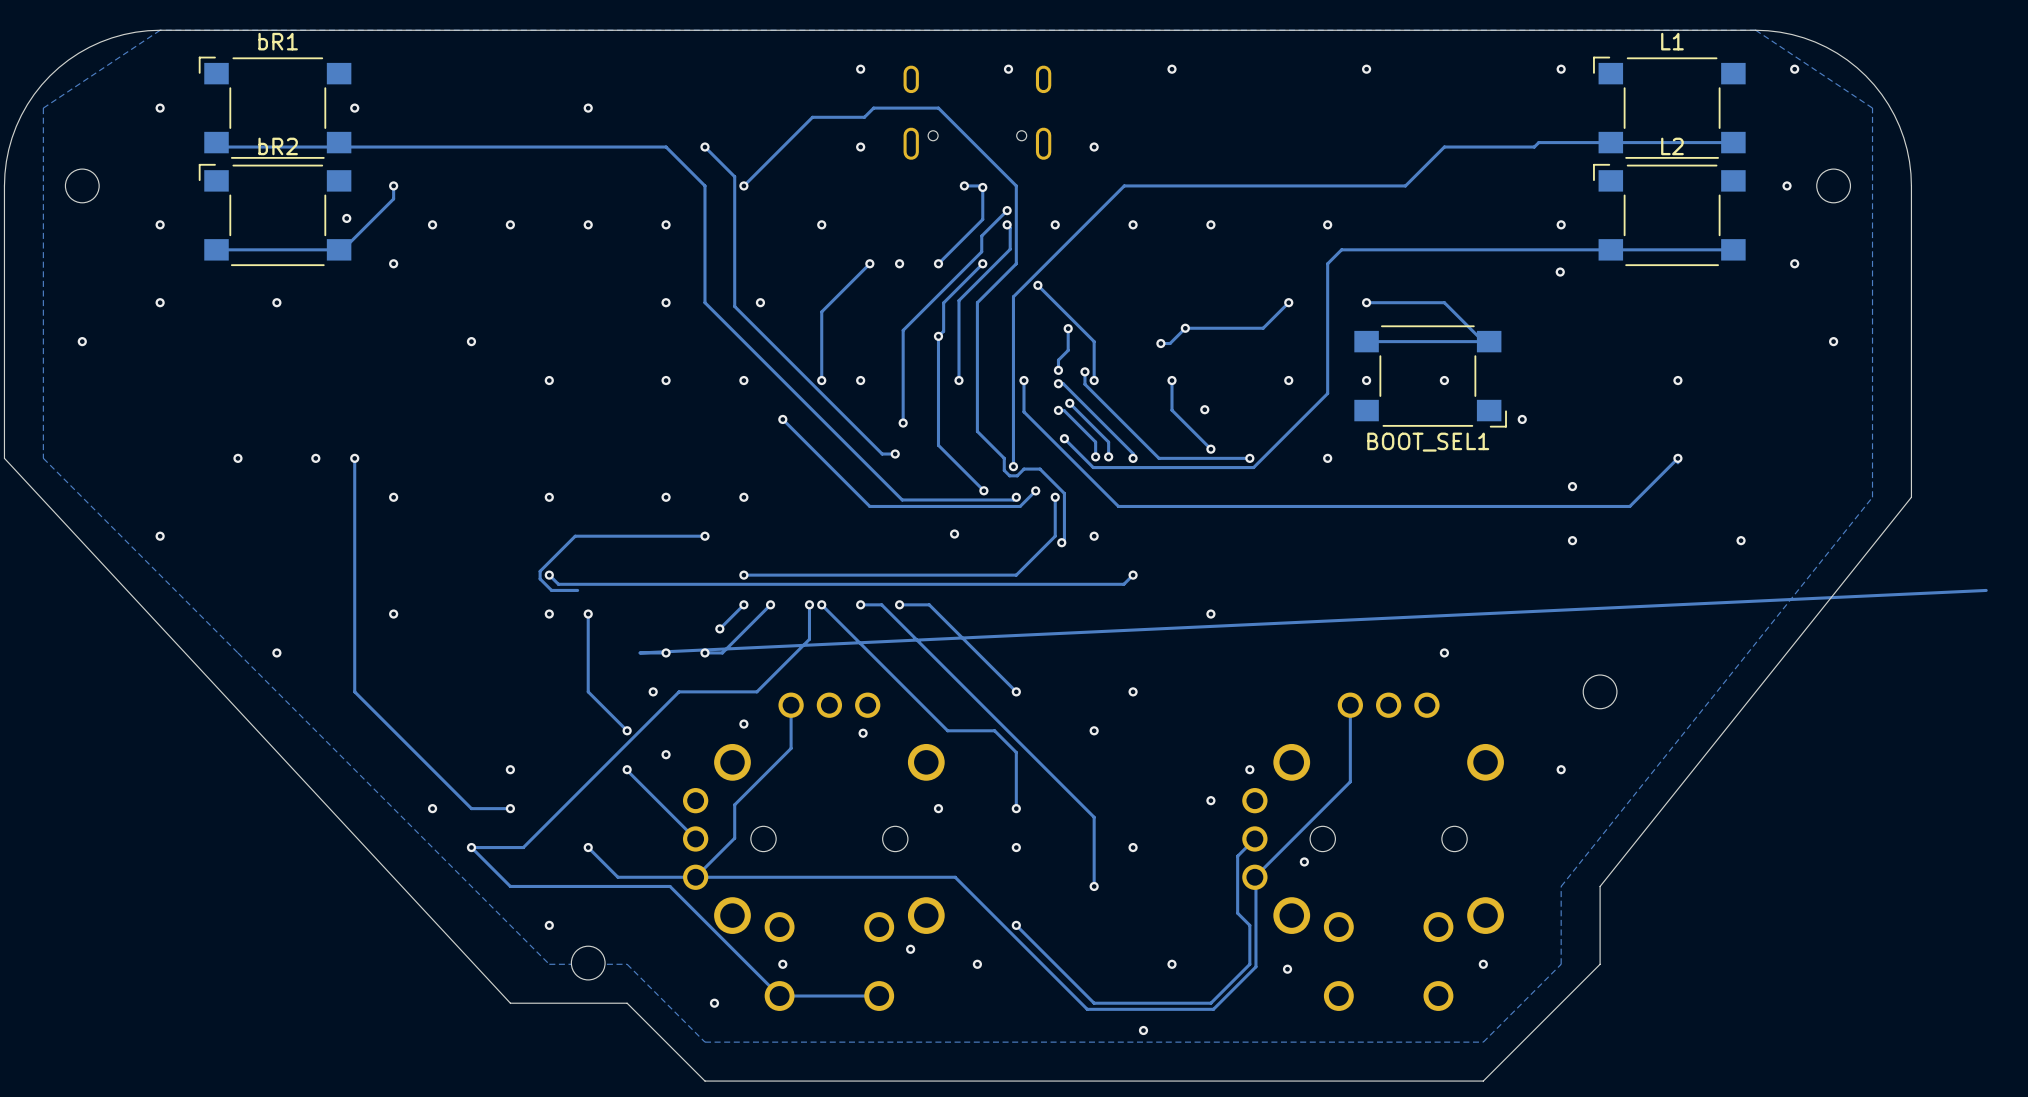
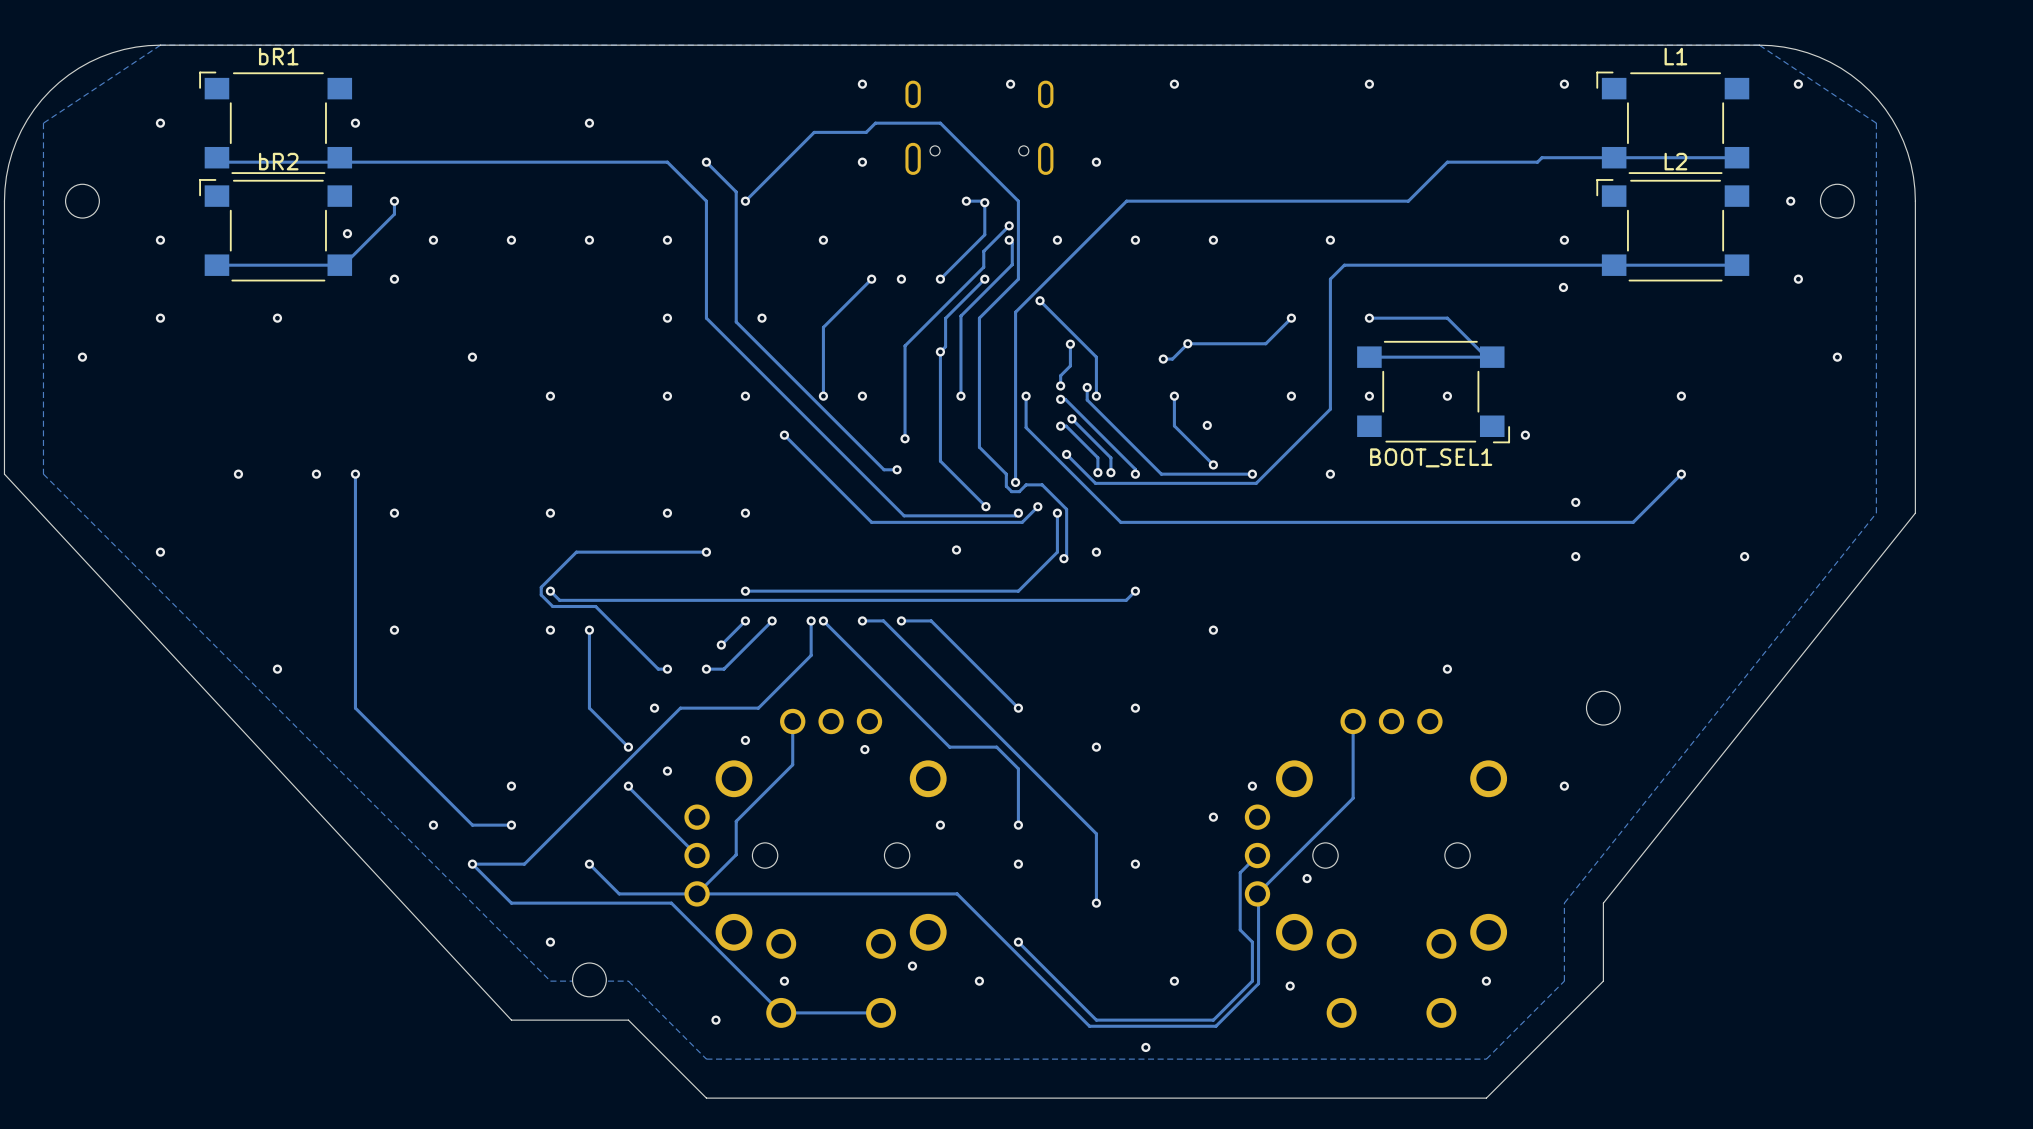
track: (1986, 590) (640, 652) (656, 652) -> (578, 606) (595, 606) (658, 669)

